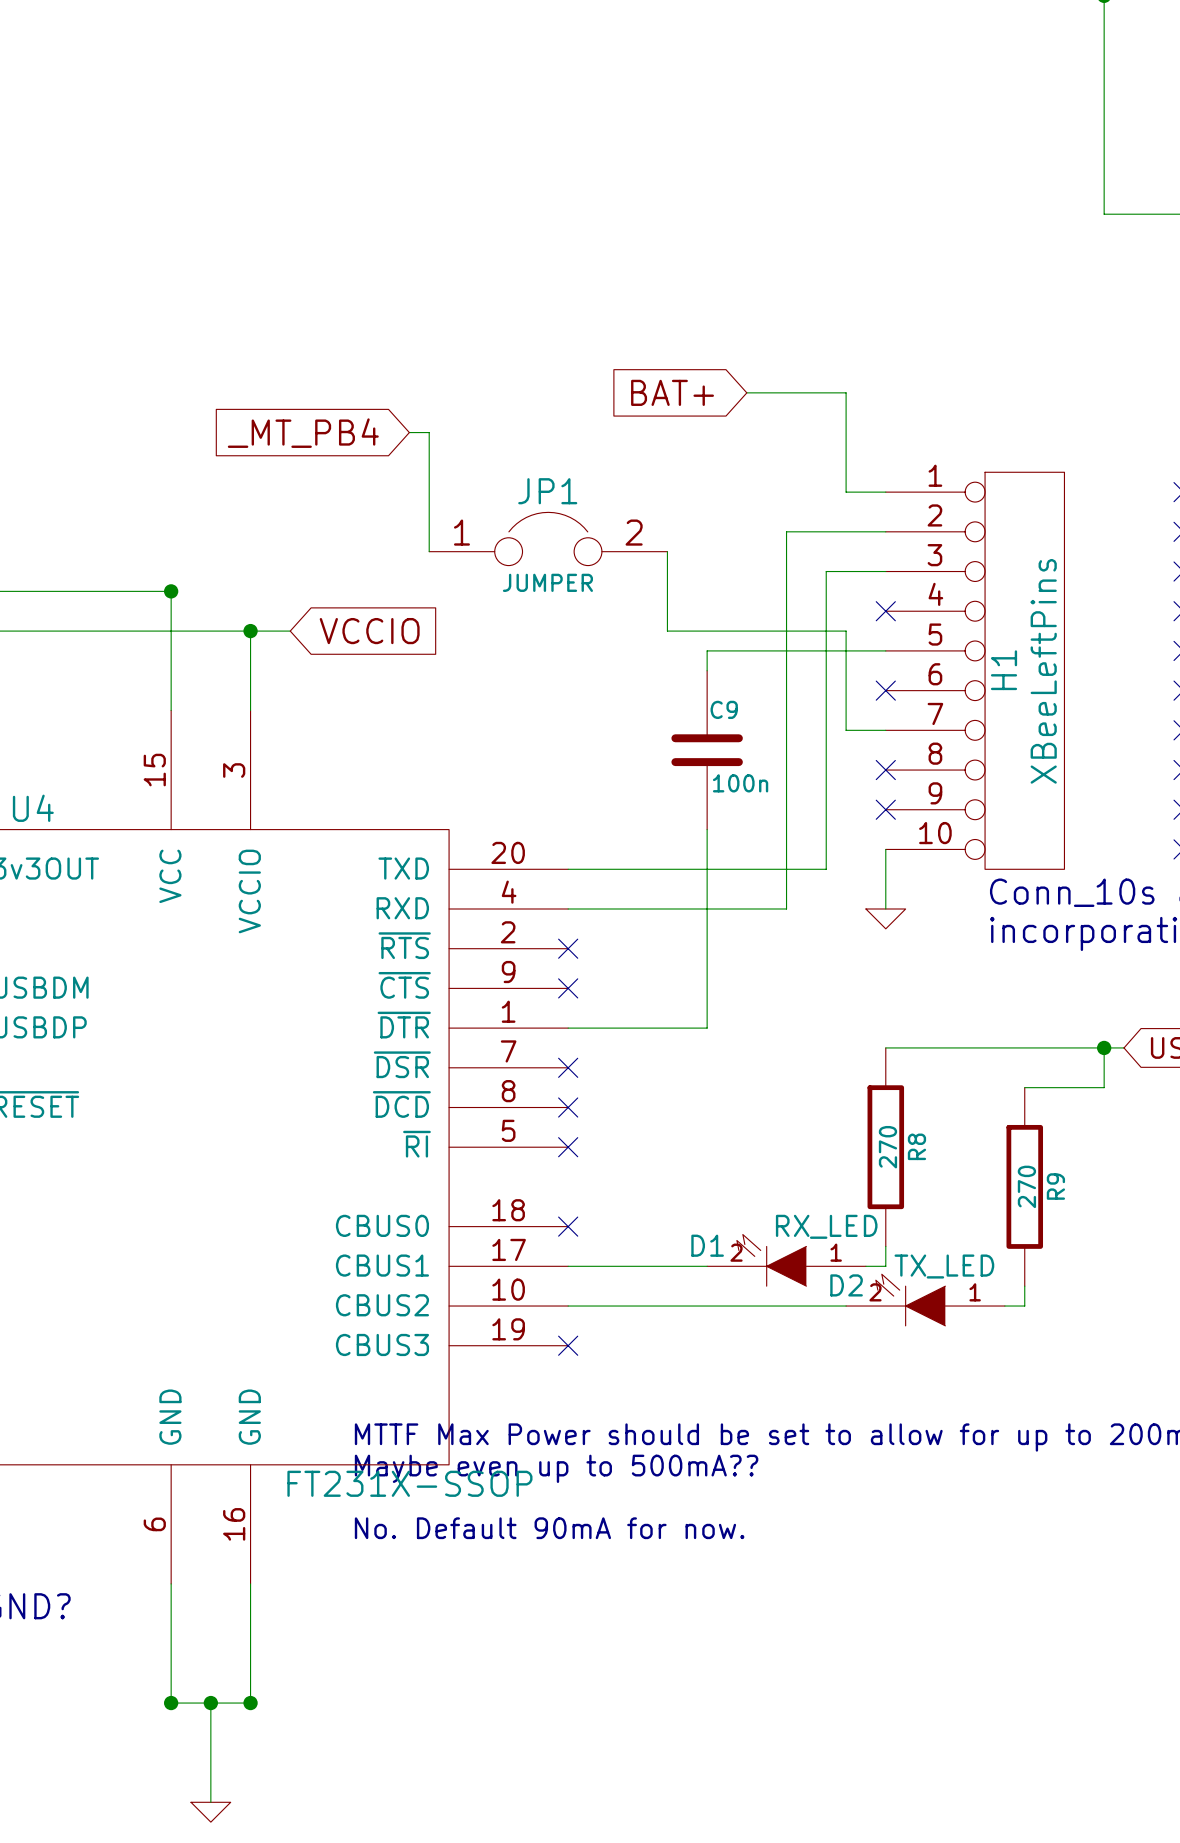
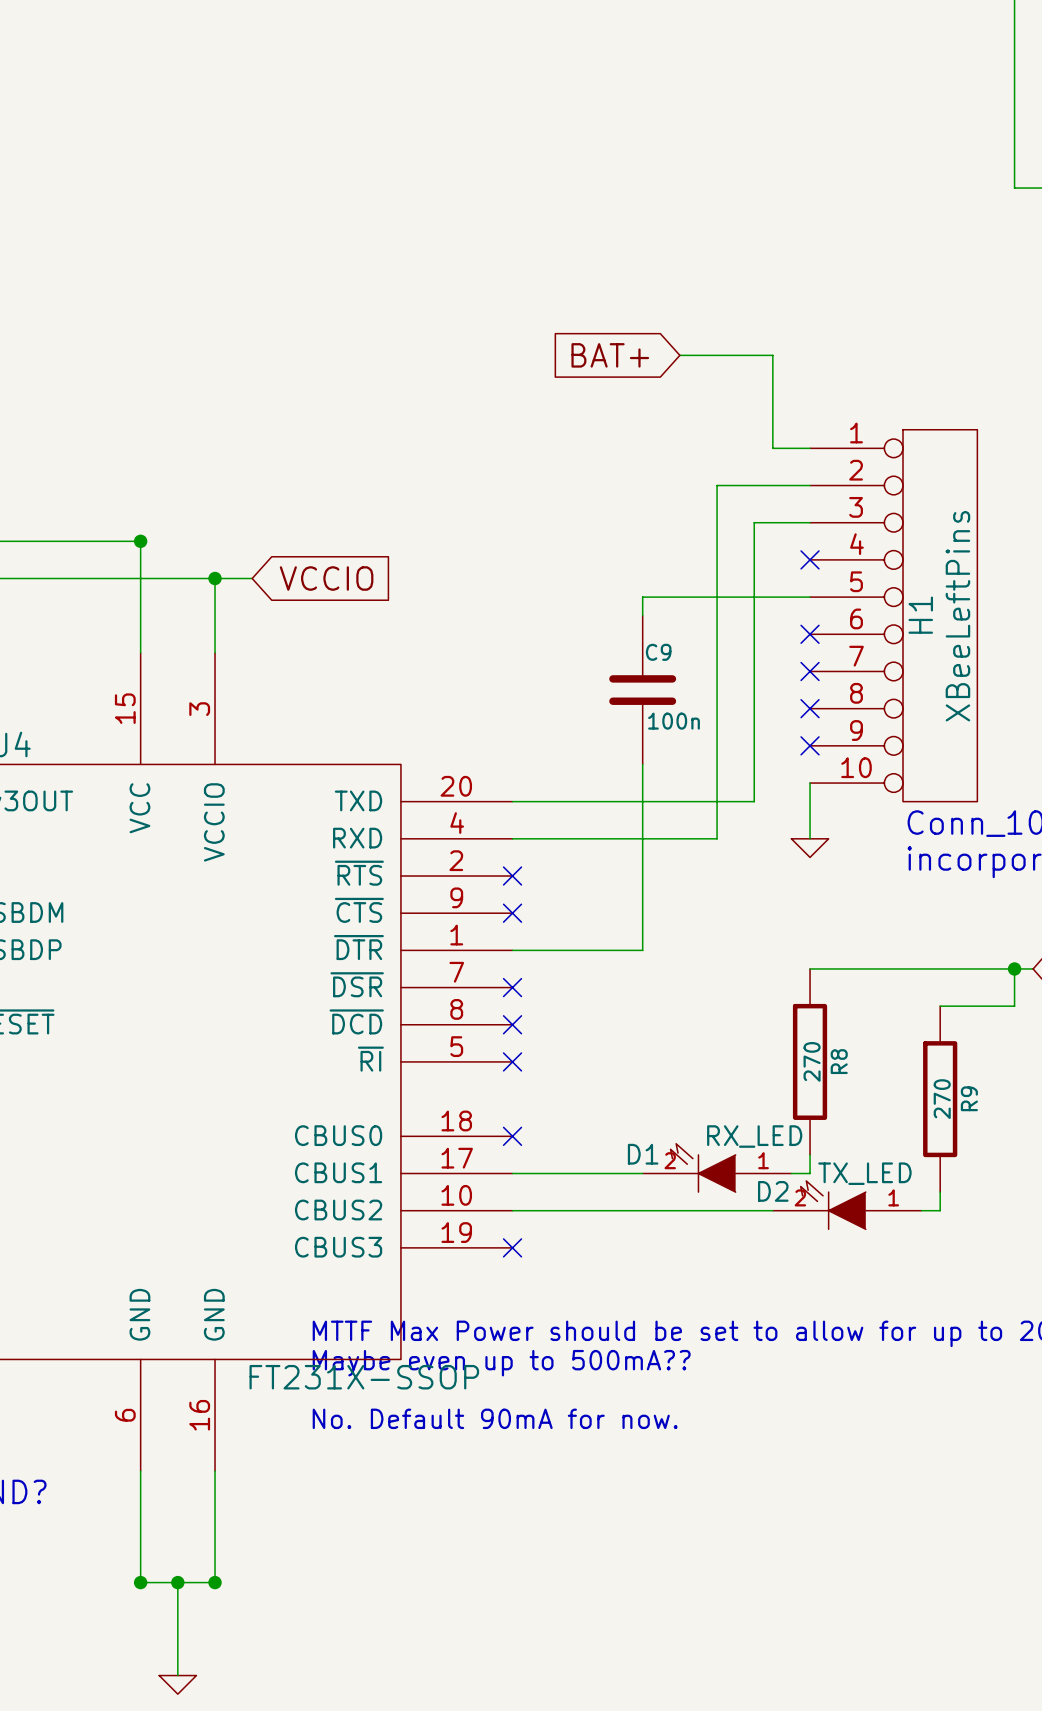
wire: (409, 432) (429, 432) (429, 551) -> none
global label: _MT_PB4 (303, 433) -> none
JP1: JUMPER (548, 538) -> none
wire: (667, 551) (667, 631) (846, 631) (846, 730) (885, 730) -> none
no-connect mark: none -> (810, 671)

